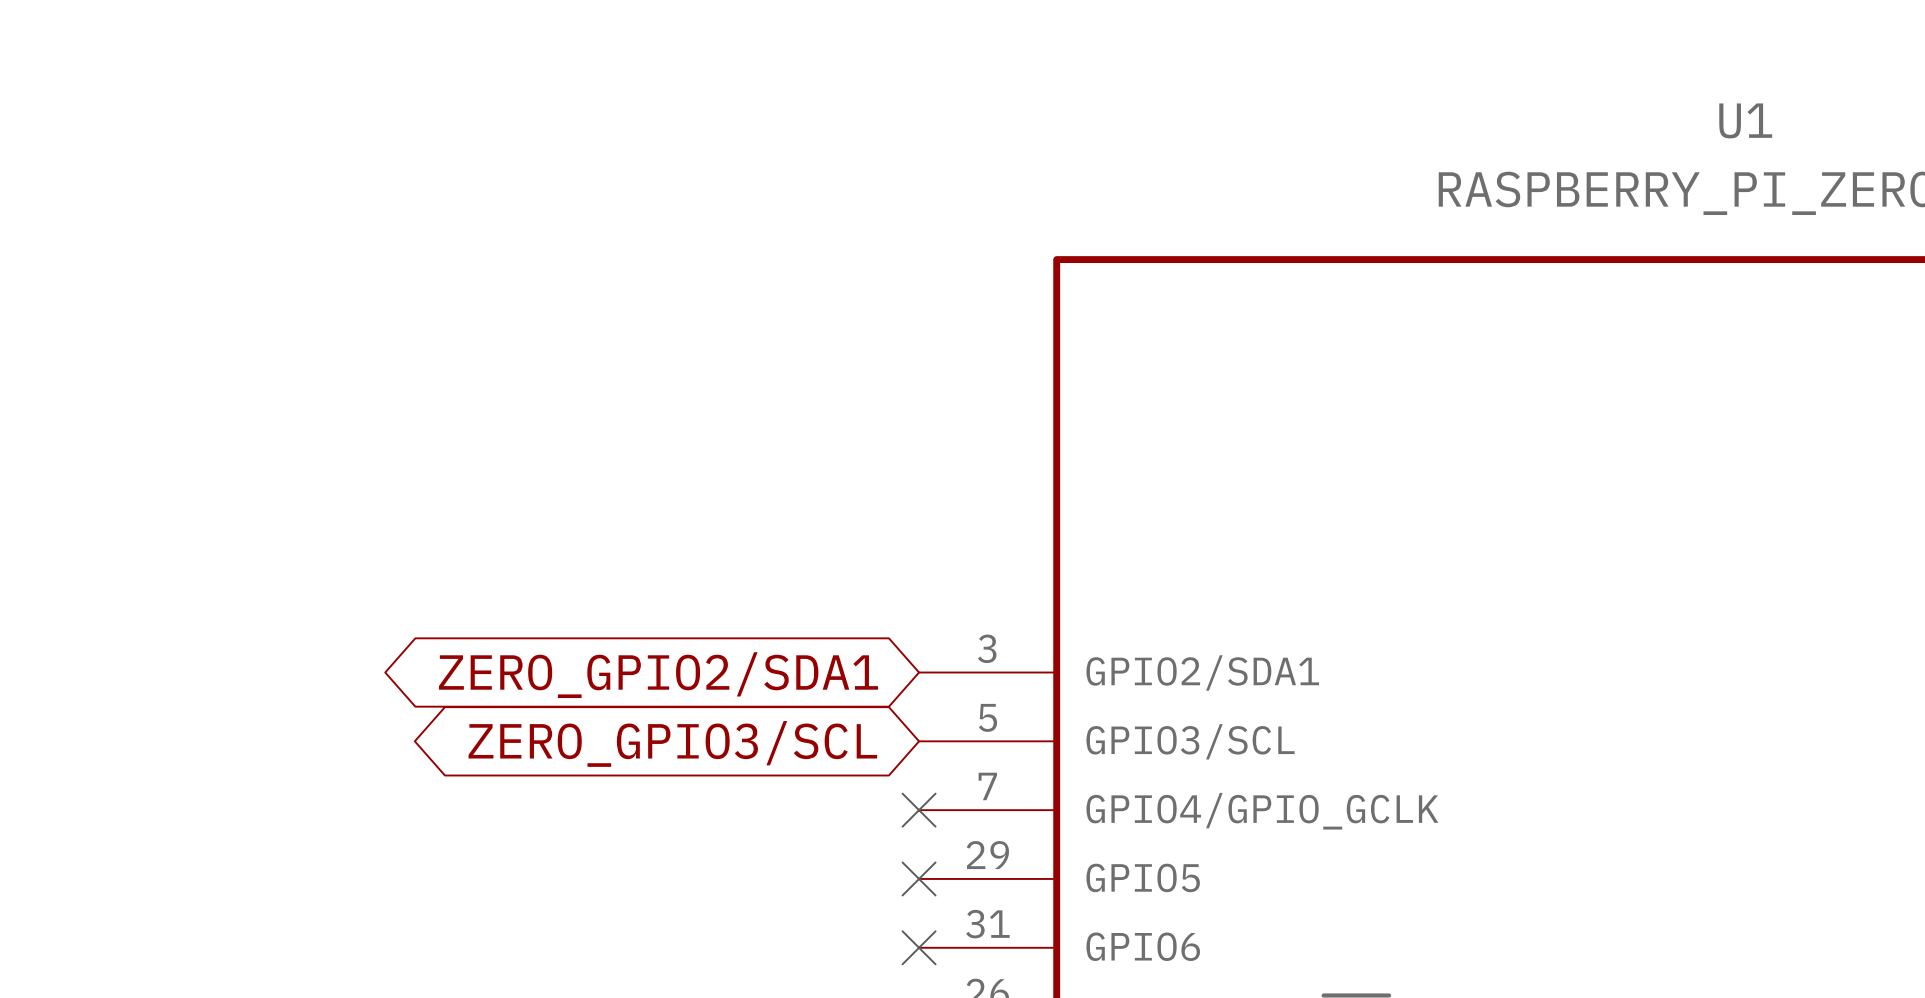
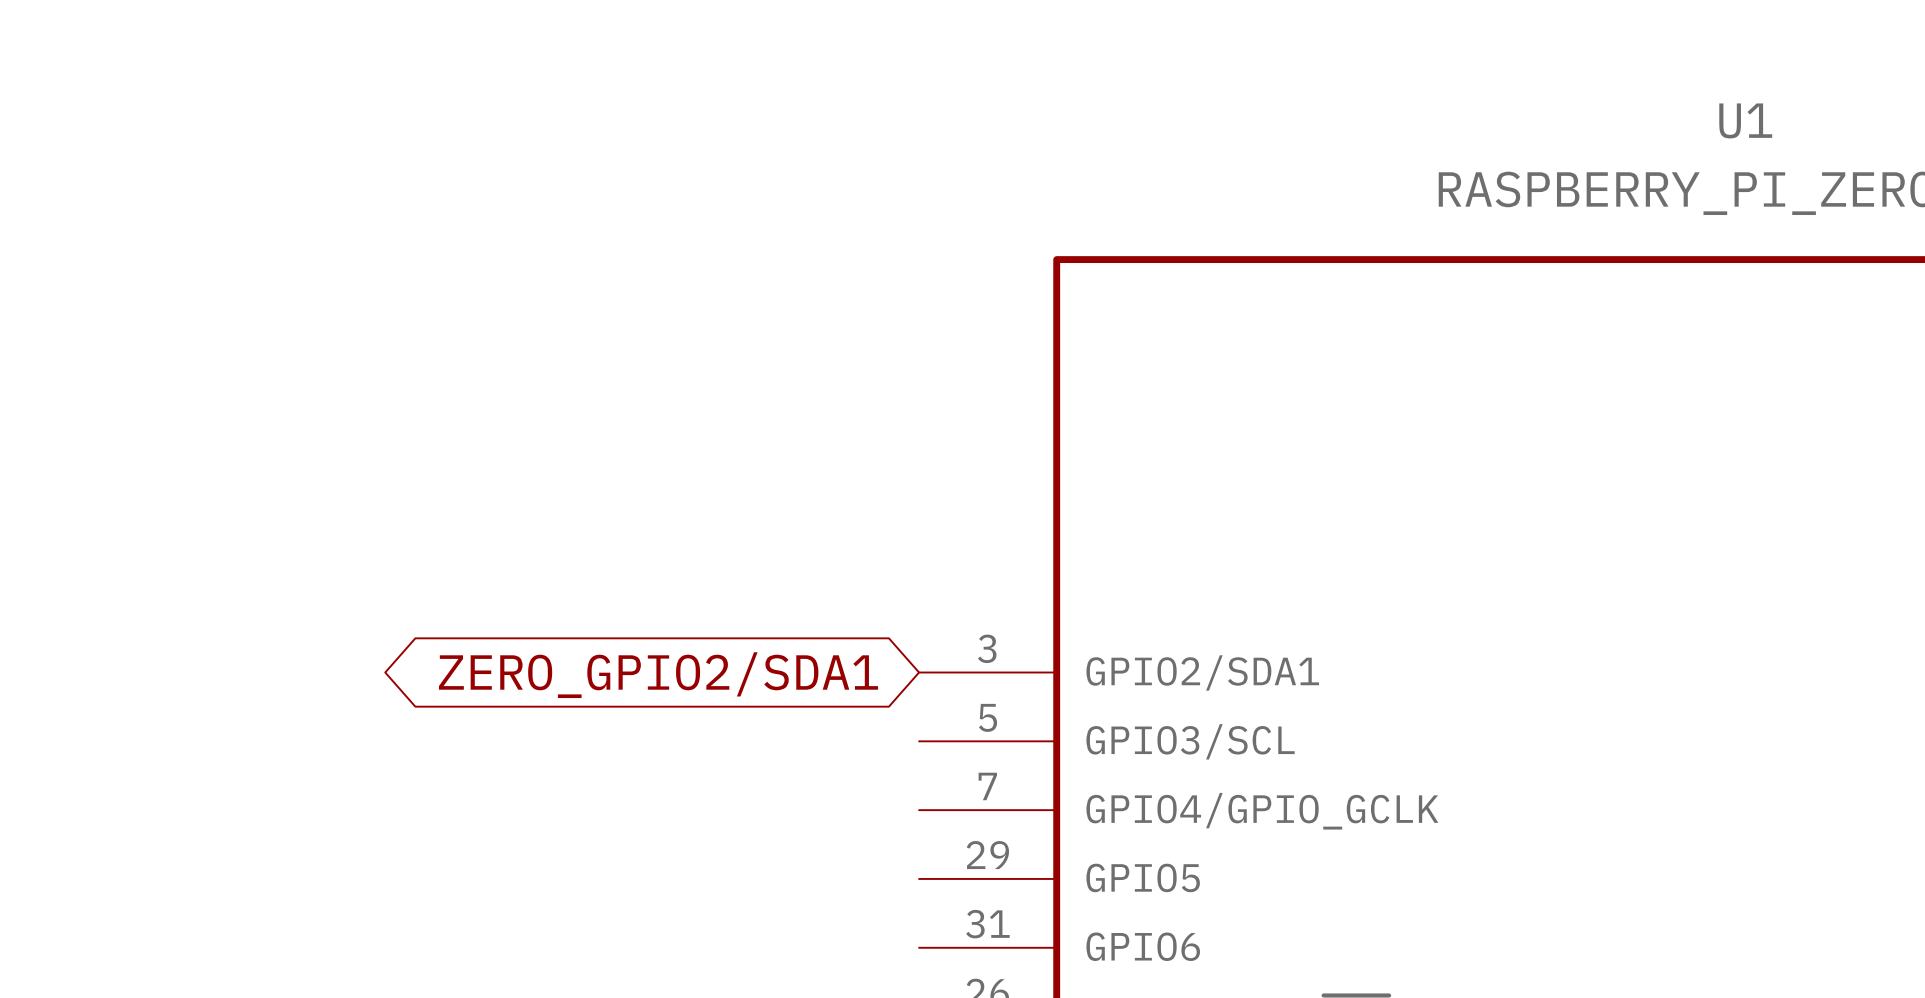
global label: ZERO_GPIO3/SCL (672, 743) -> none
no-connect mark: (919, 810) -> none
no-connect mark: (919, 878) -> none
no-connect mark: (919, 947) -> none

